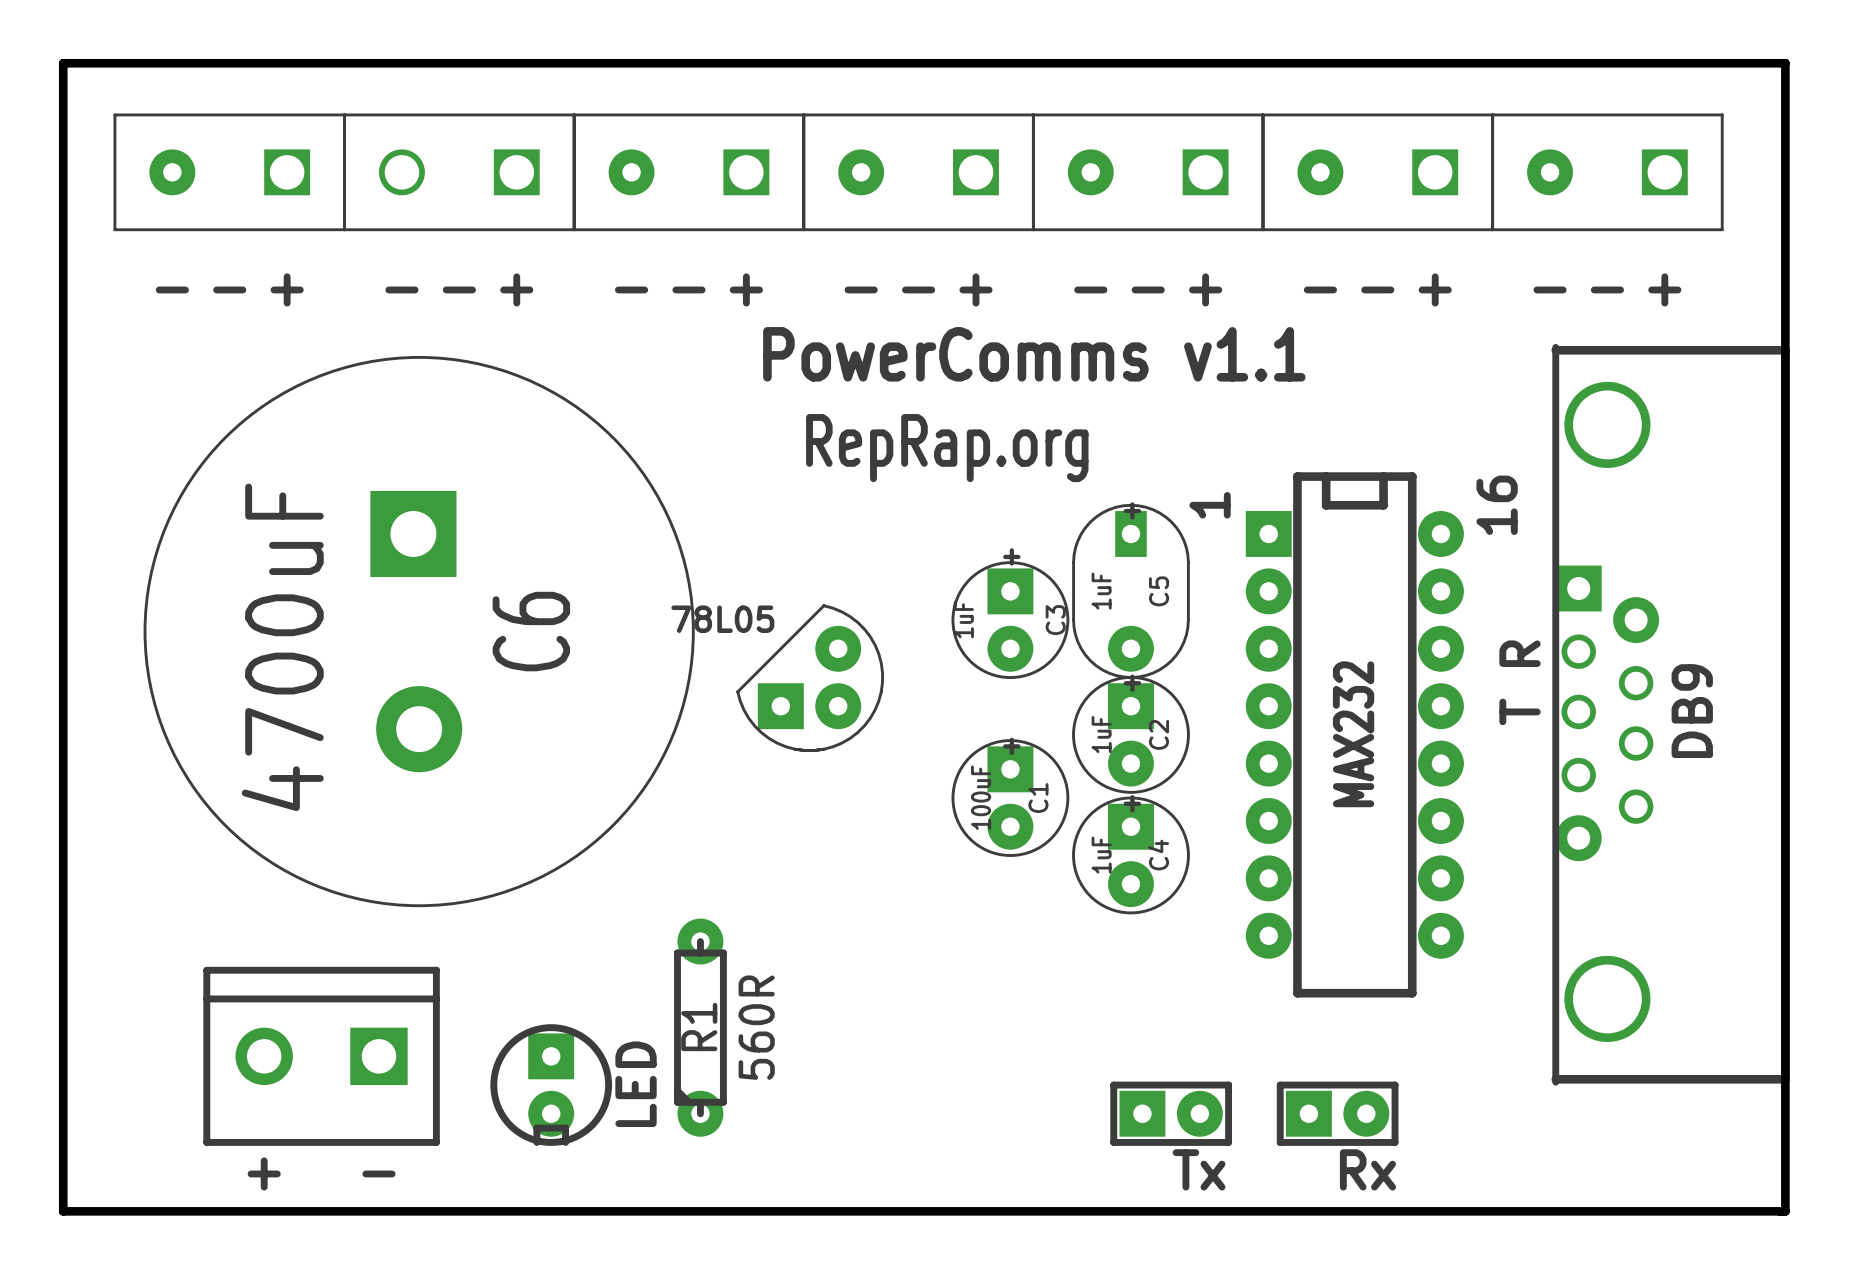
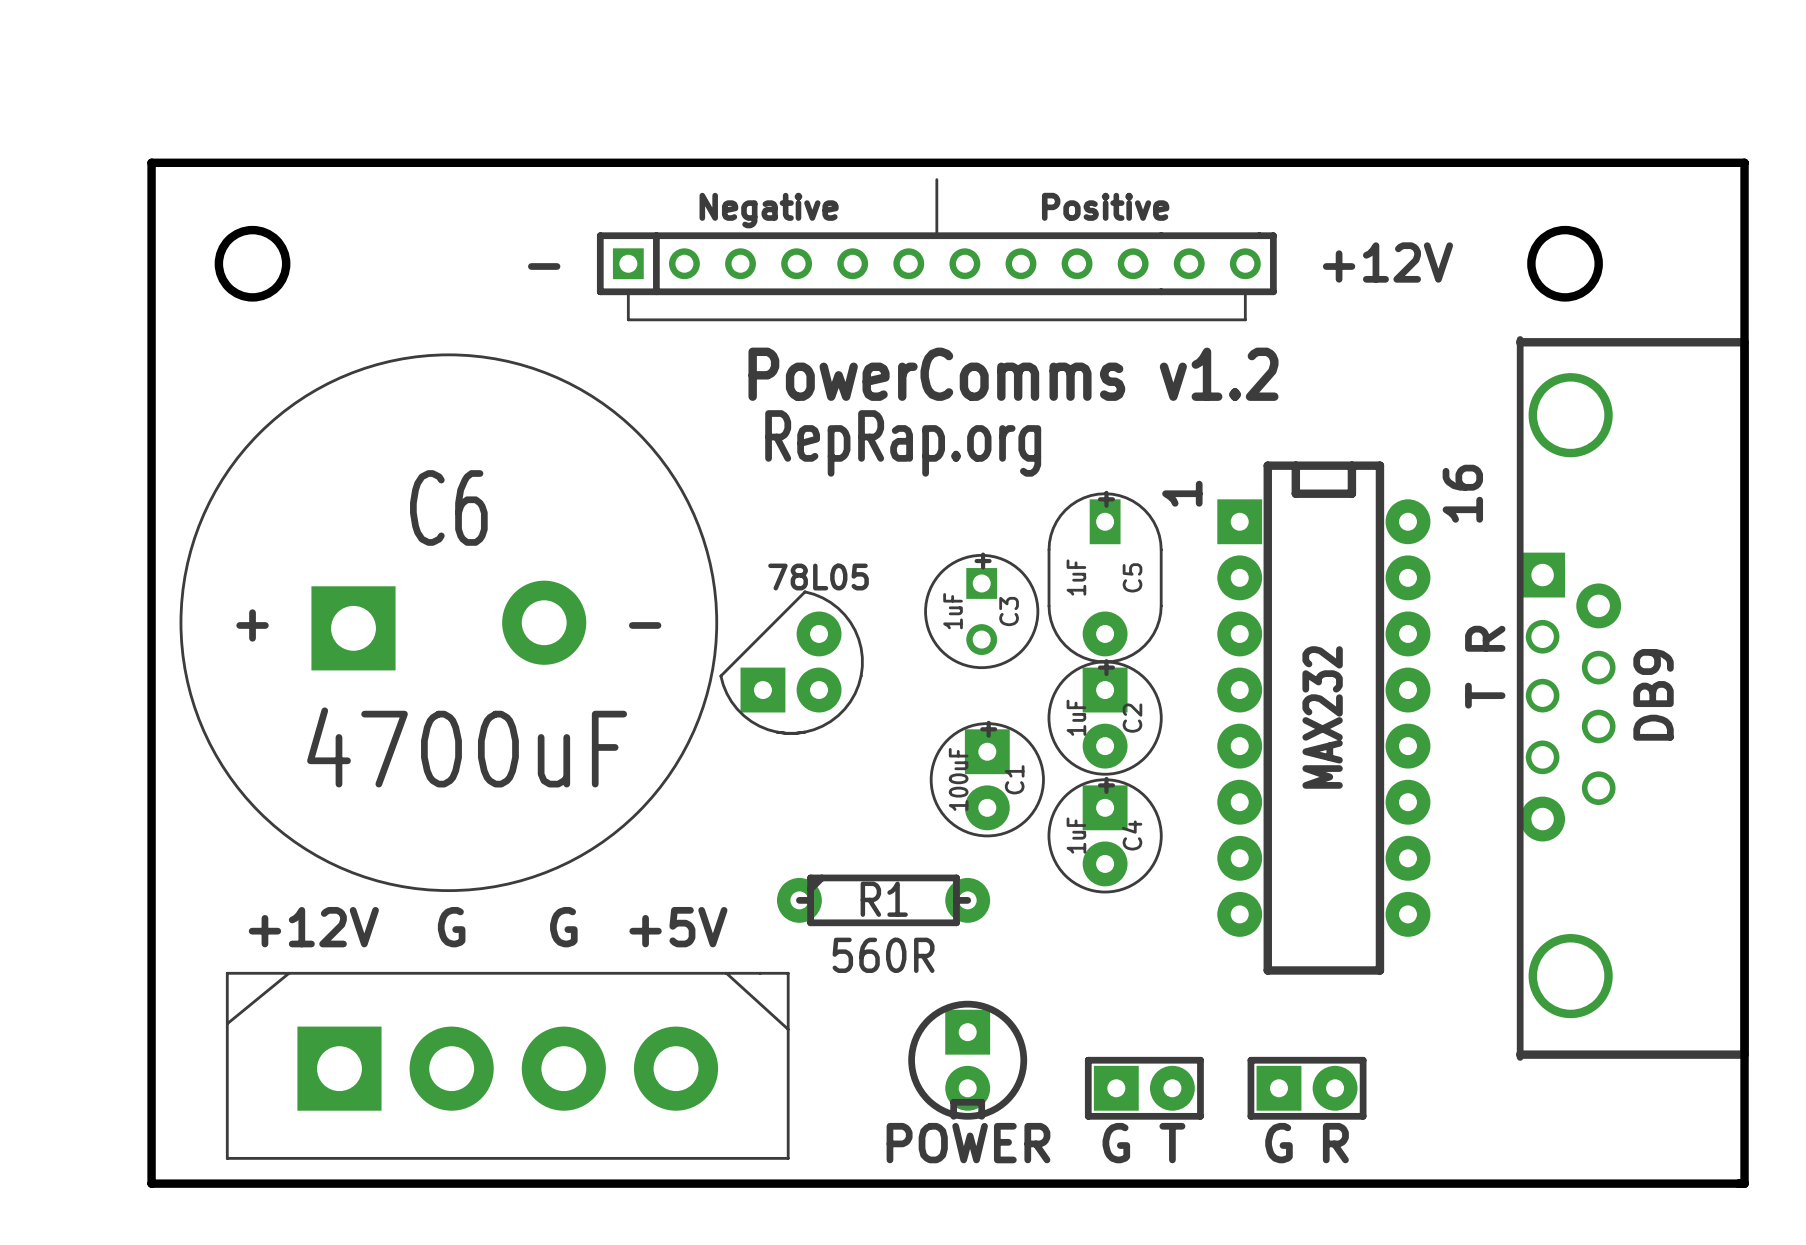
board edge: (1785, 166) (1785, 63) (63, 63) (63, 1211) (155, 1211) -> (1744, 162) (151, 162) (151, 1183)
part: (229, 172) -> none
part: (459, 172) -> none
part: (688, 172) -> none
part: (918, 172) -> none
part: (1148, 172) -> none
part: (1377, 172) -> none
part: (1607, 172) -> none
round board edge: none -> [214, 225, 291, 302]
round board edge: none -> [1527, 225, 1603, 302]
part: none -> (936, 249)
text: PowerComms v1.1 (1034, 354) -> PowerComms v1.2 (1013, 374)
C6 footprint: [143, 355, 695, 908] -> [179, 353, 719, 893]
text position: RepRap.org (947, 448) -> RepRap.org (903, 443)
C3 footprint: [951, 561, 1070, 679] -> [924, 553, 1040, 670]
part value position: 78L05 (722, 619) -> 78L05 (818, 577)
C6 name position: C6 (531, 631) -> C6 (448, 507)
C6 value position: 4700uF (282, 647) -> 4700uF (467, 747)
R1 rotation: 0° (700, 1027) -> 90° clockwise (883, 900)
R1 position: (700, 1027) -> (883, 900)
part: (321, 1056) -> none
part: LED (551, 1085) -> none
part: none -> (967, 1060)
part: none -> (507, 1065)
part text: none -> G (1116, 1143)
part text: Tx (1199, 1169) -> T (1172, 1143)
part text: none -> G (1278, 1143)
part text: Rx (1367, 1169) -> R (1335, 1143)

